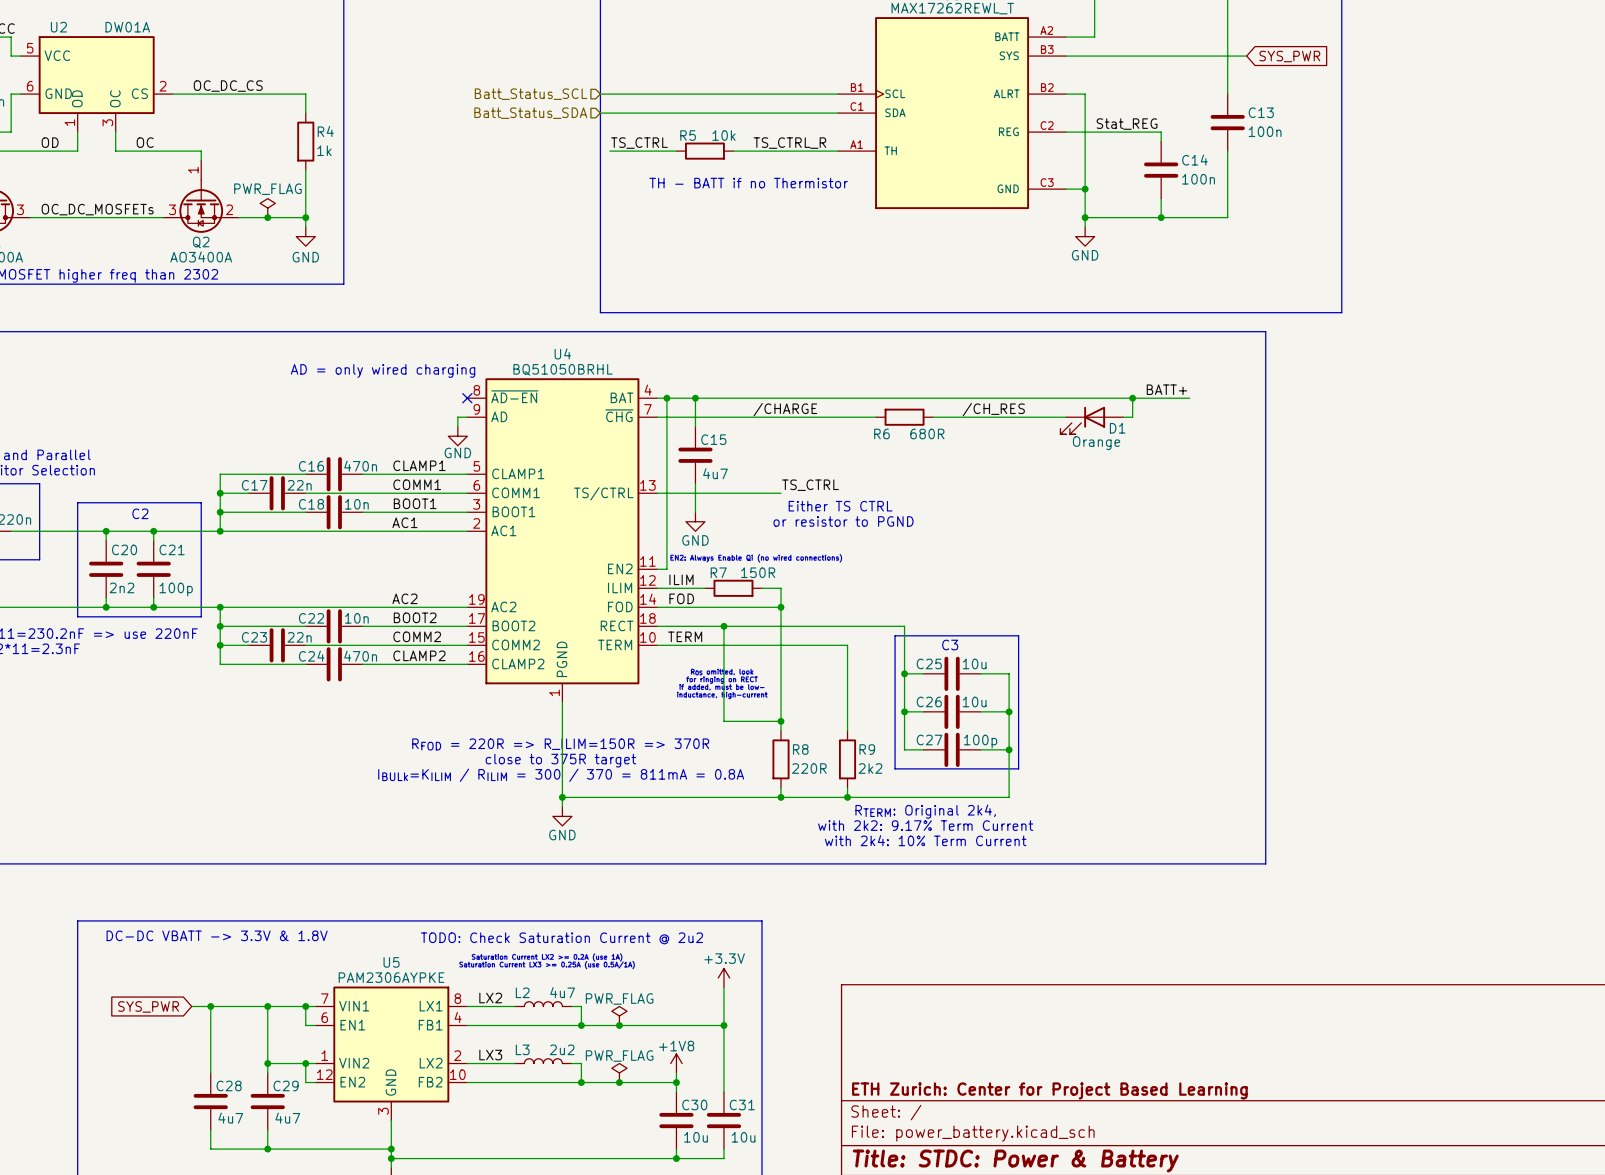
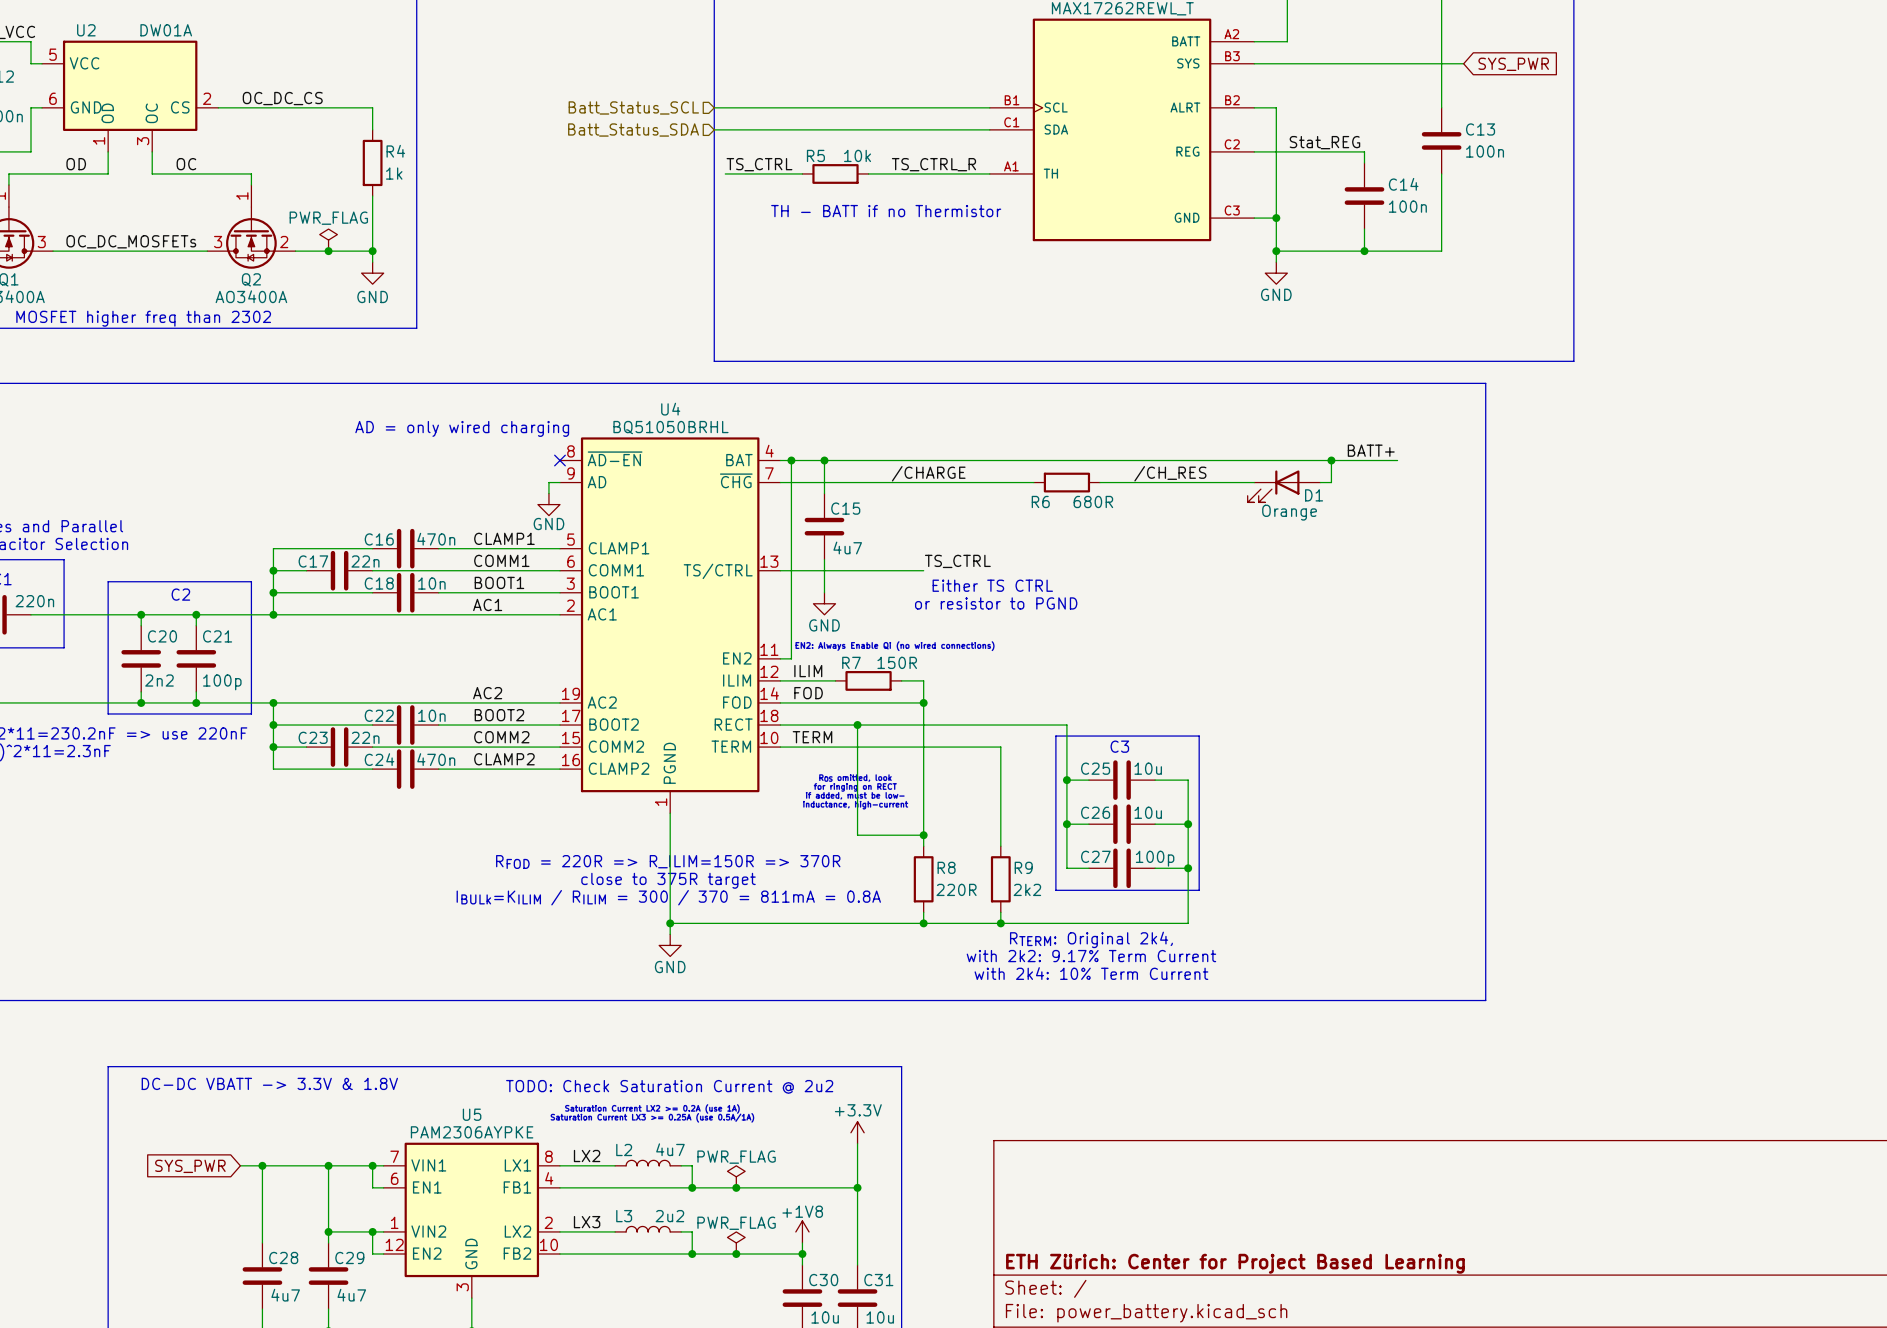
title block: ETH Zurich: Center for Project Based Learning (1049, 1090) -> ETH Zürich: Center for Project Based Learning (1235, 1263)

